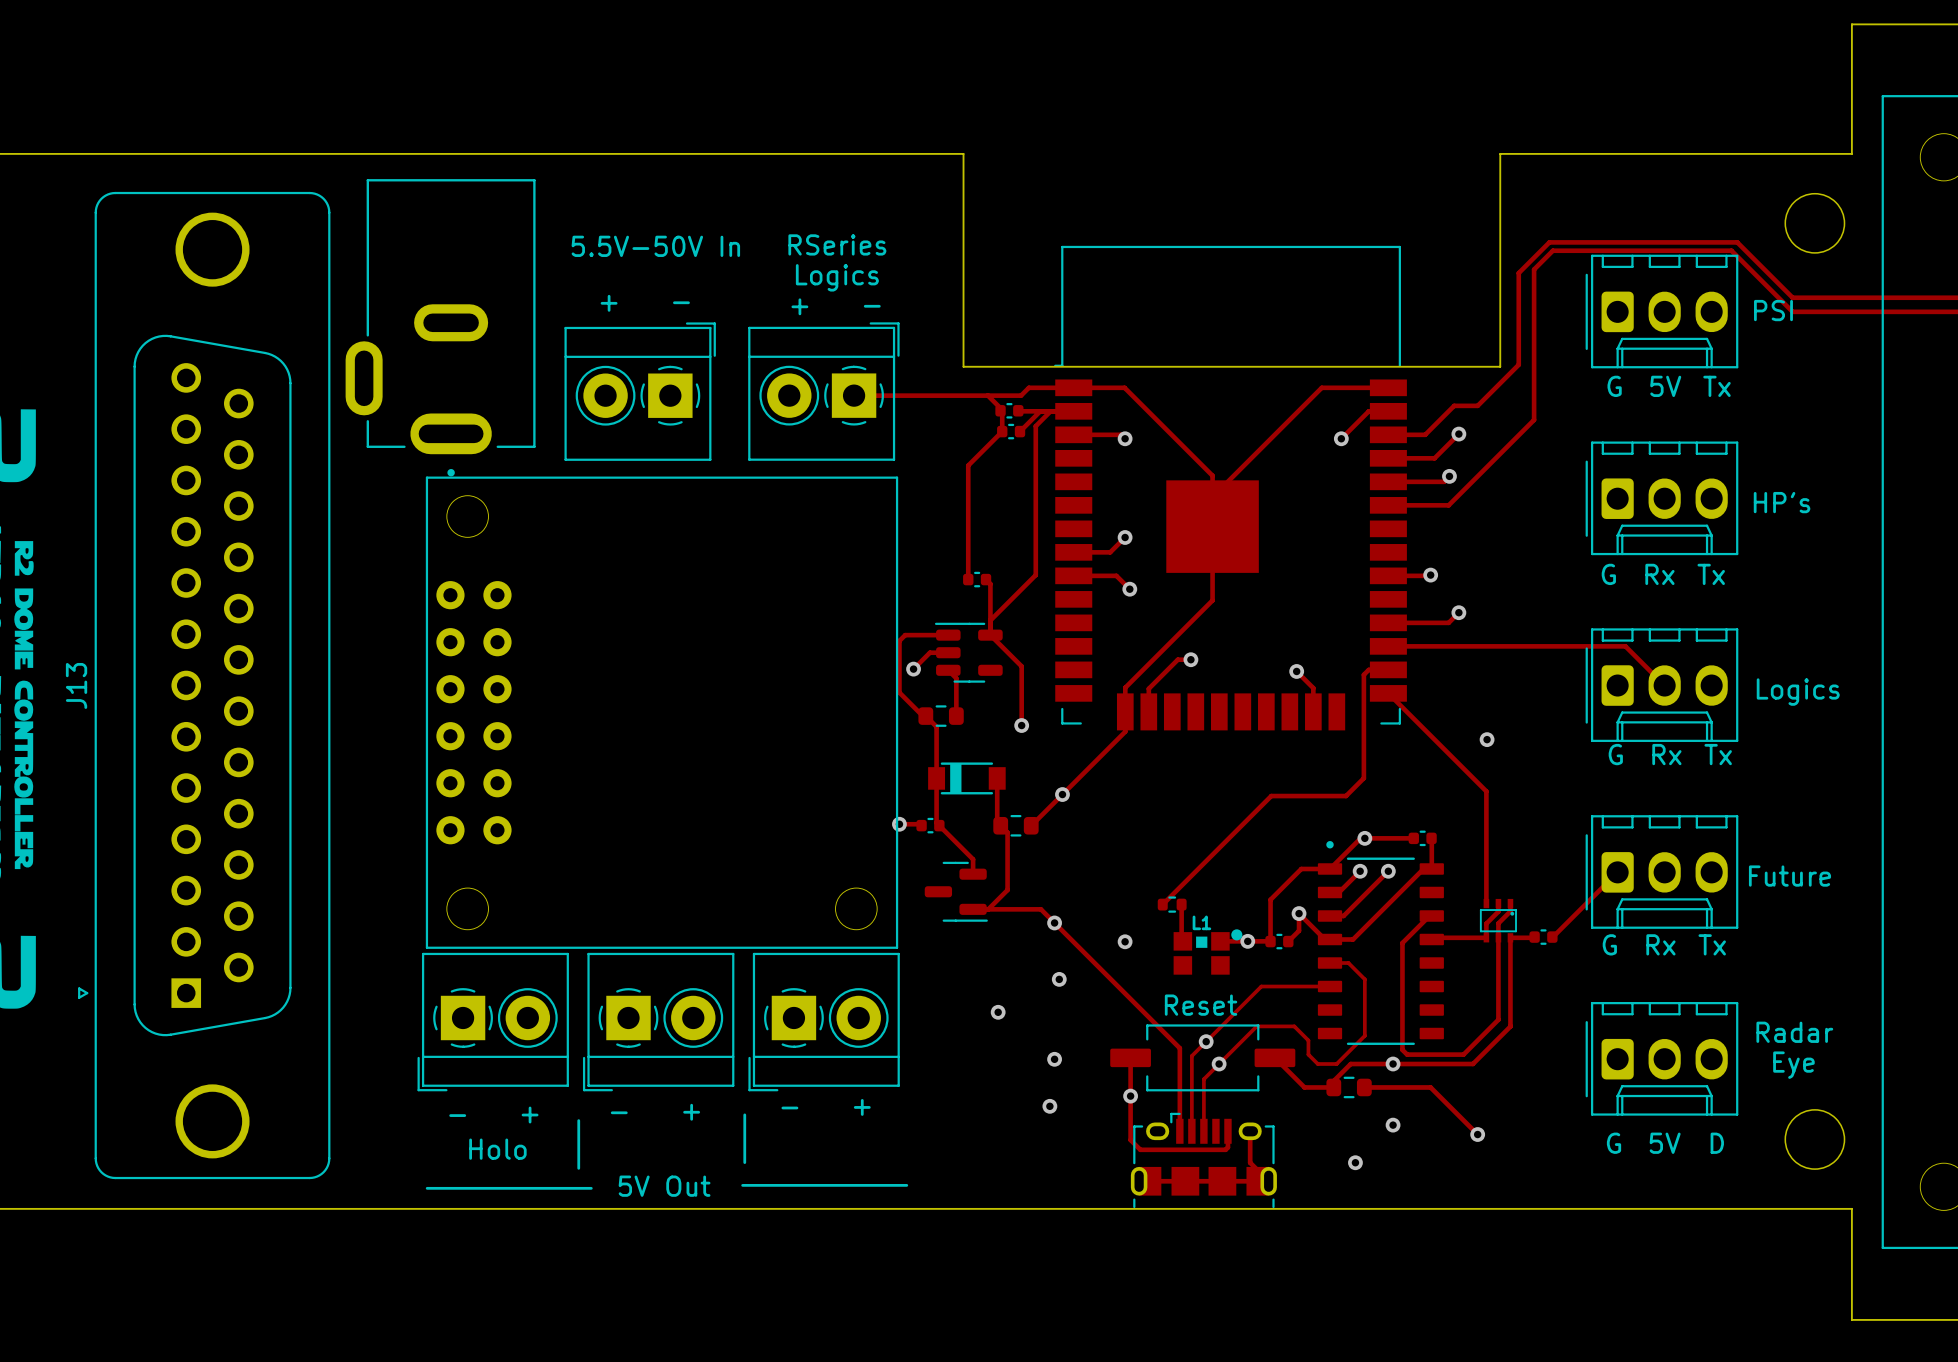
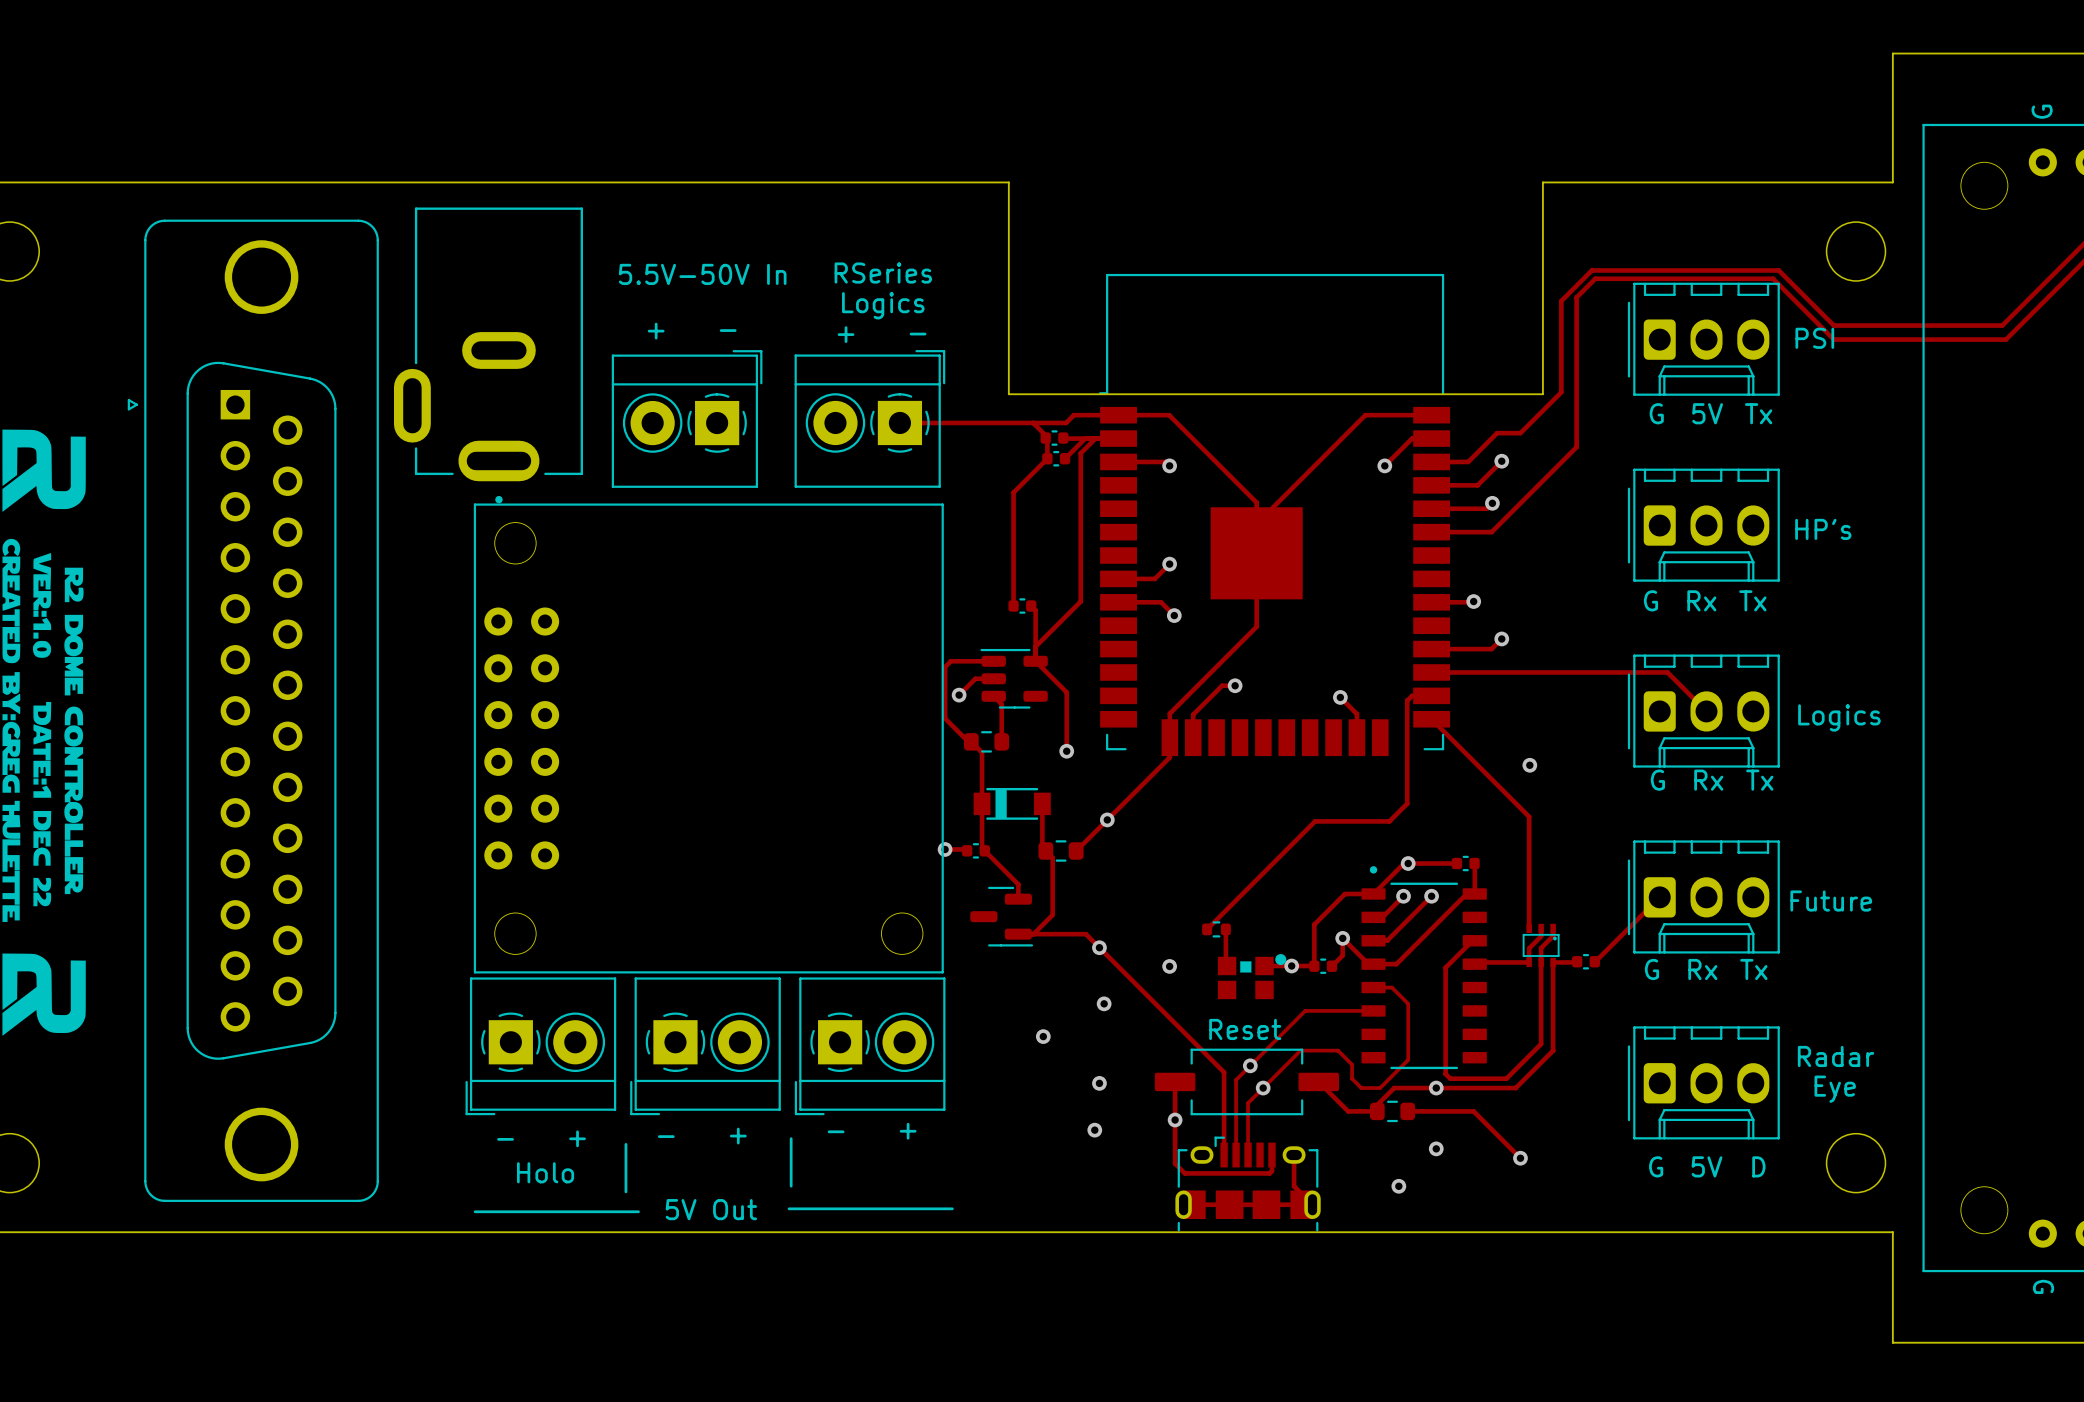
part: none -> (253, 710)
J13: (204, 685) -> none
L1 name: L1 (1201, 922) -> none

